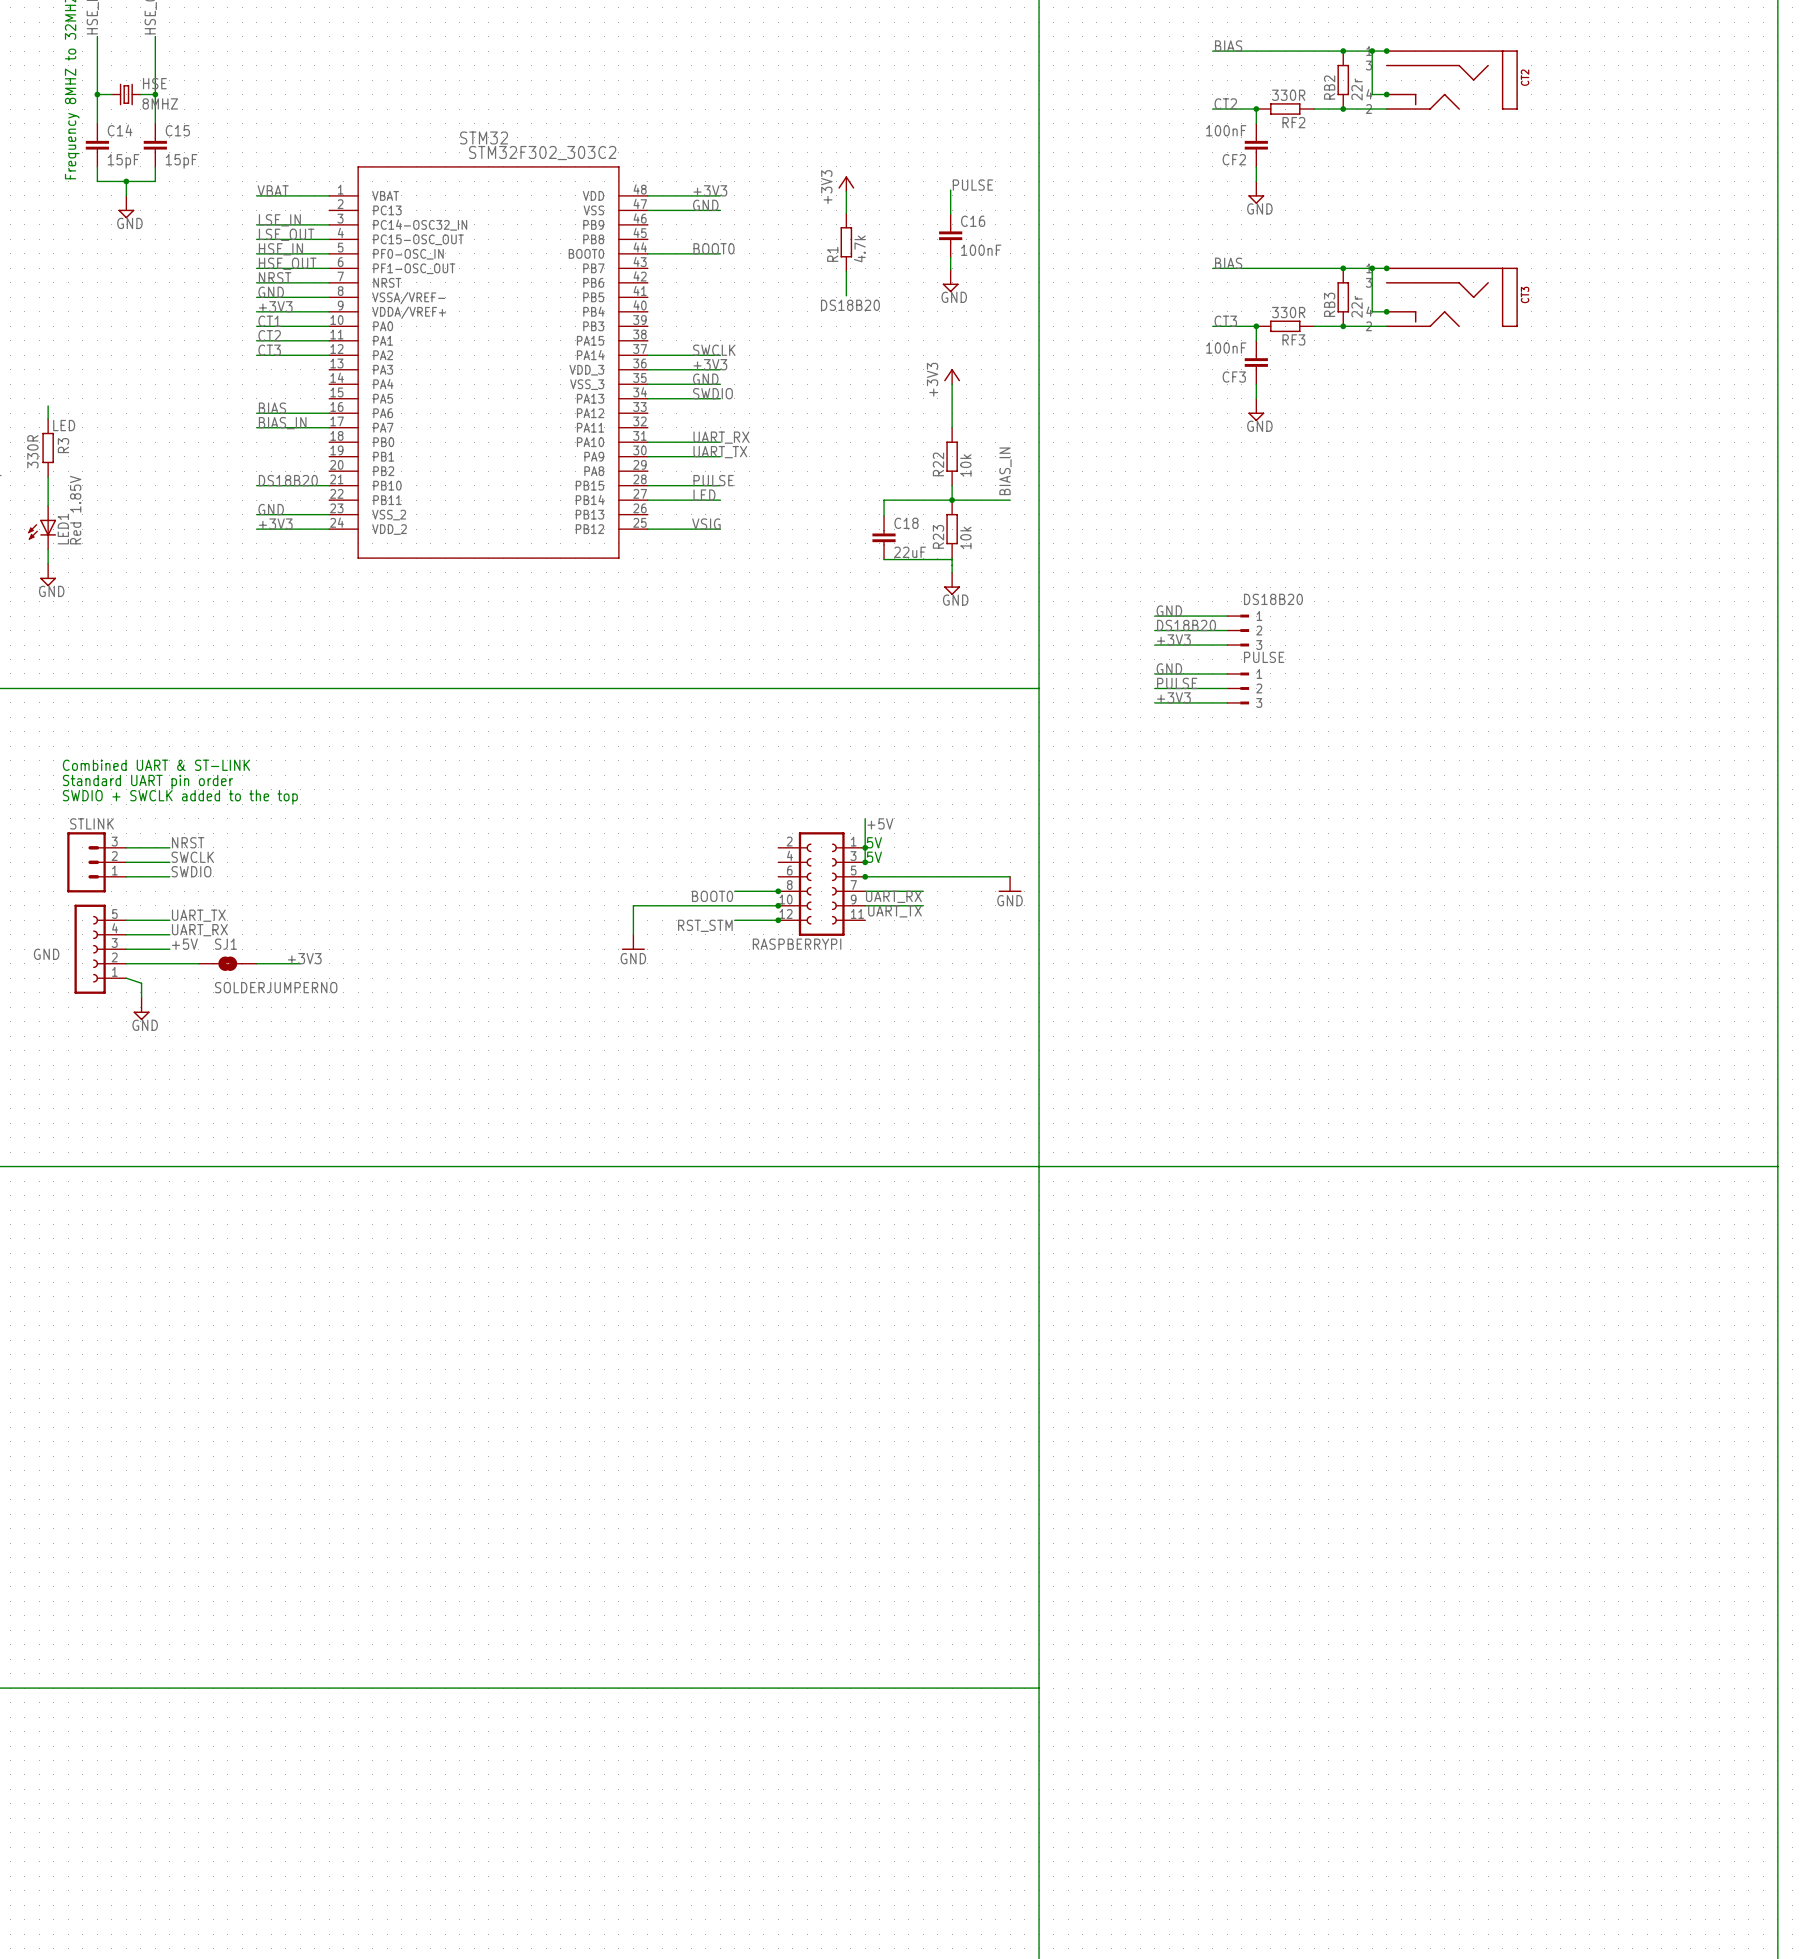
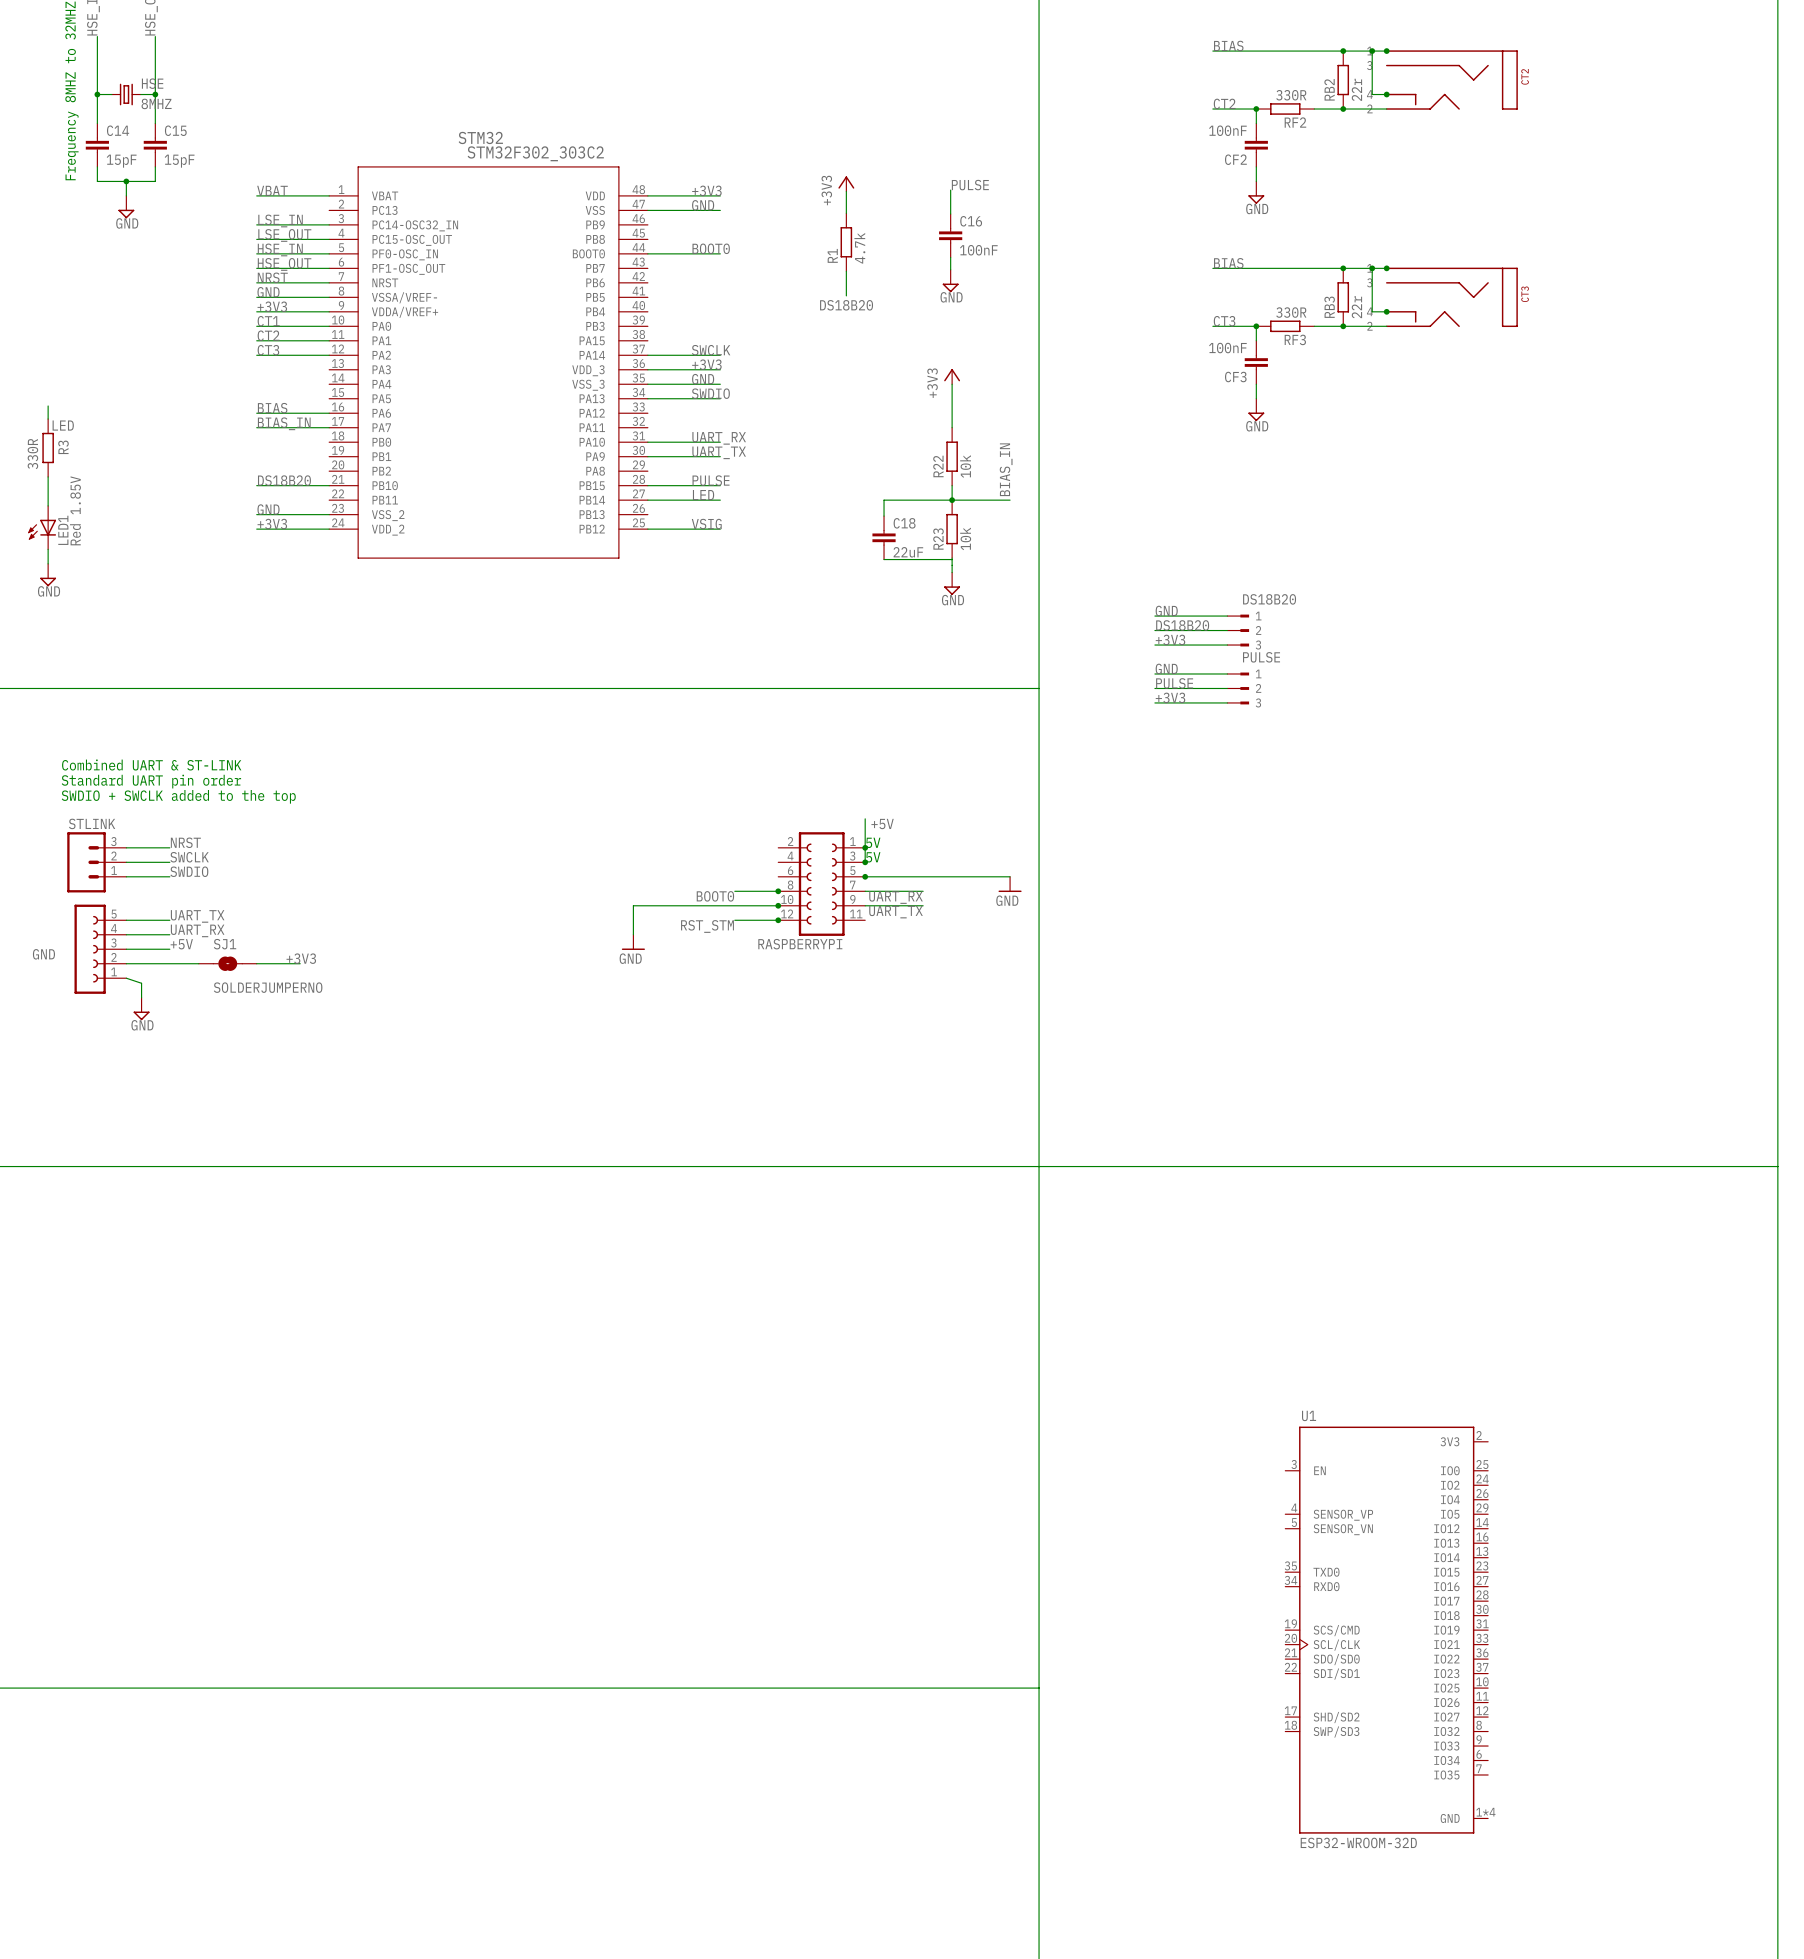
U1: none -> ESP32-WROOM-32D (1386, 1630)

